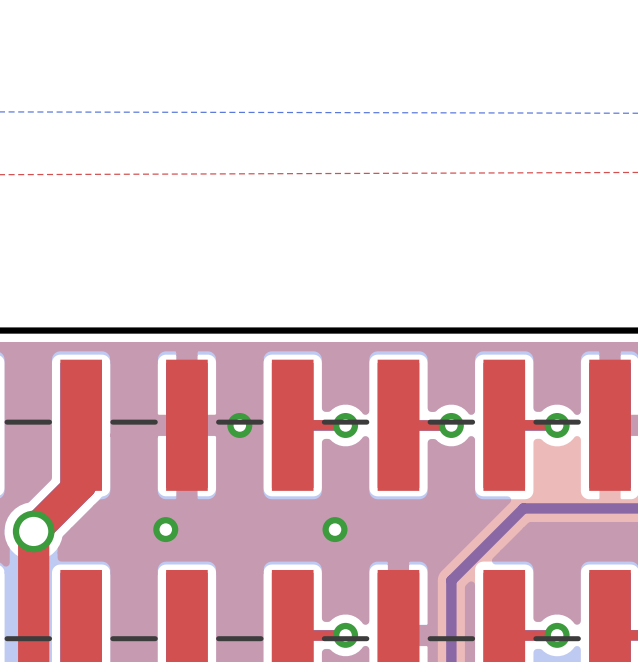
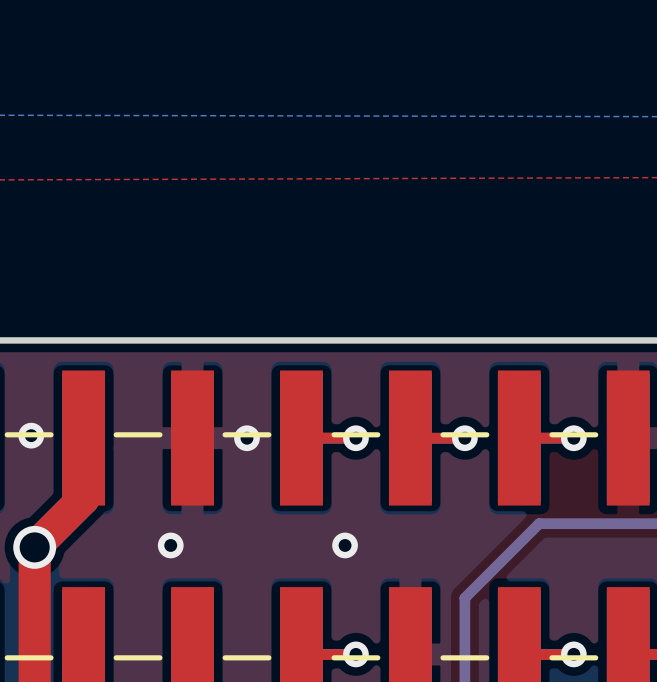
via: none -> (31, 435)

